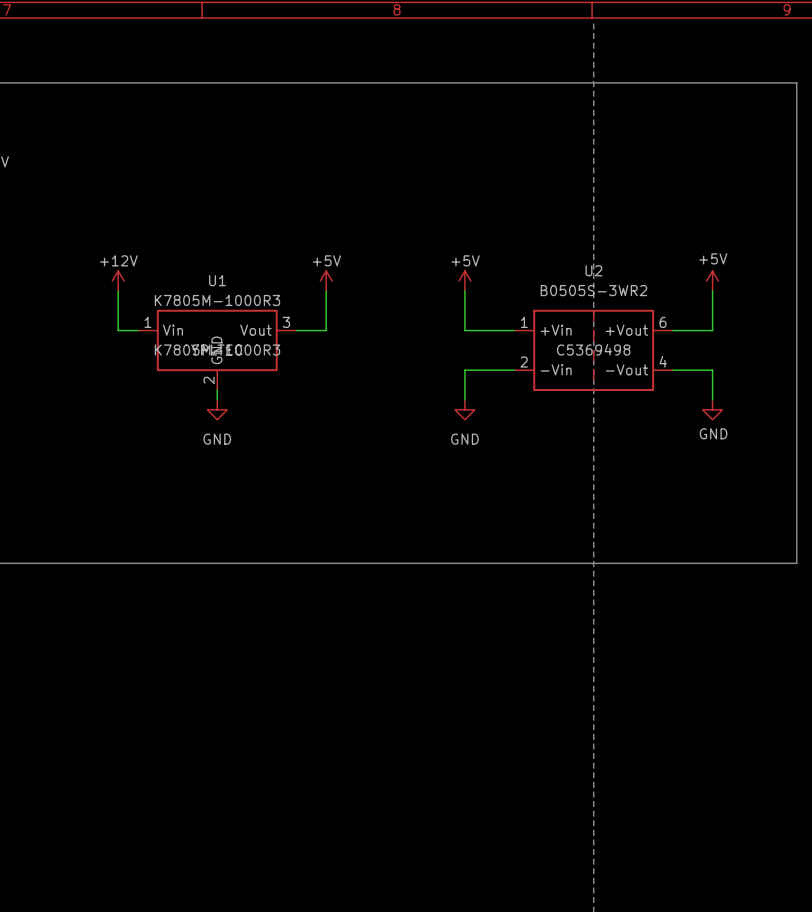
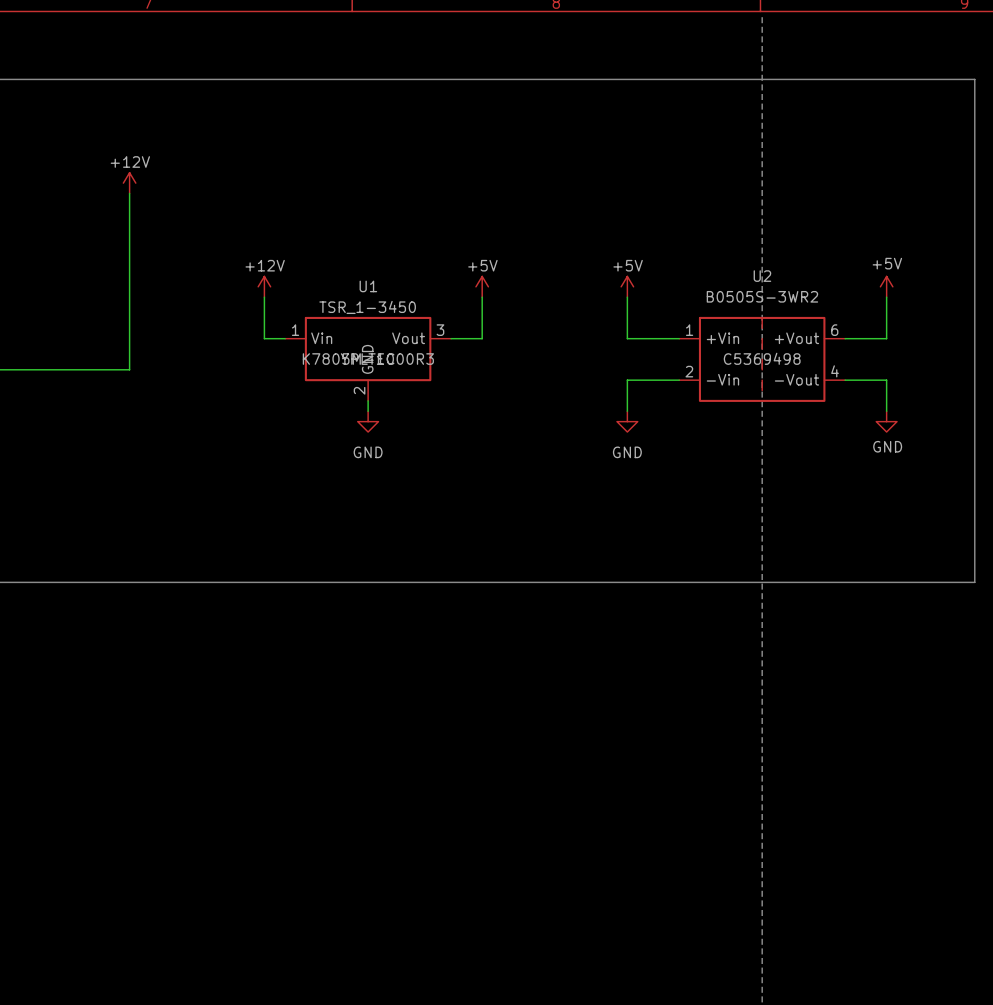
U1 value: K7805M-1000R3 (217, 300) -> TSR_1-3450 (367, 307)

